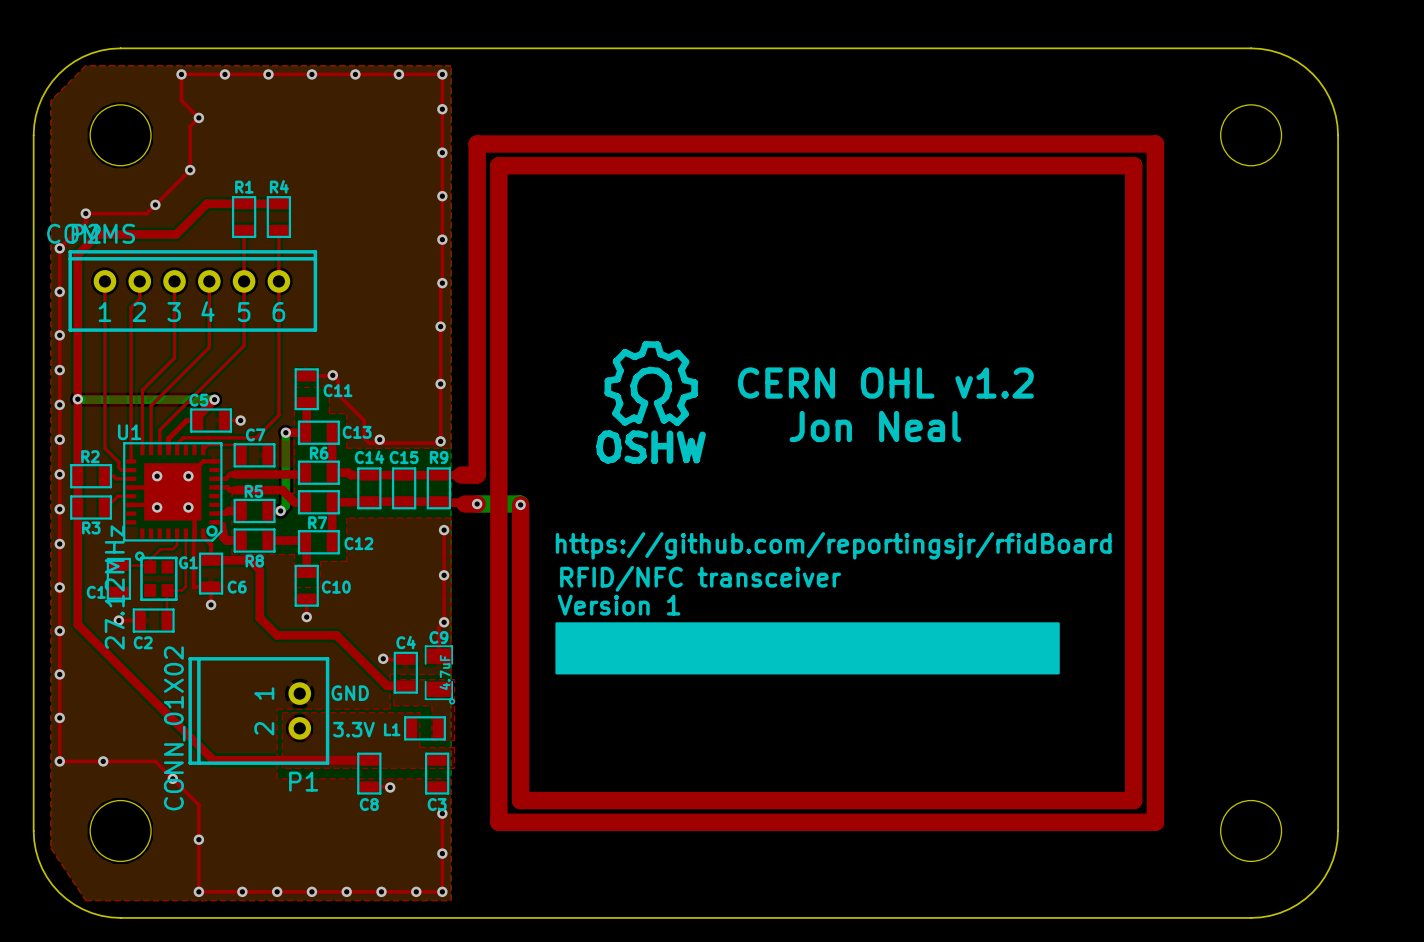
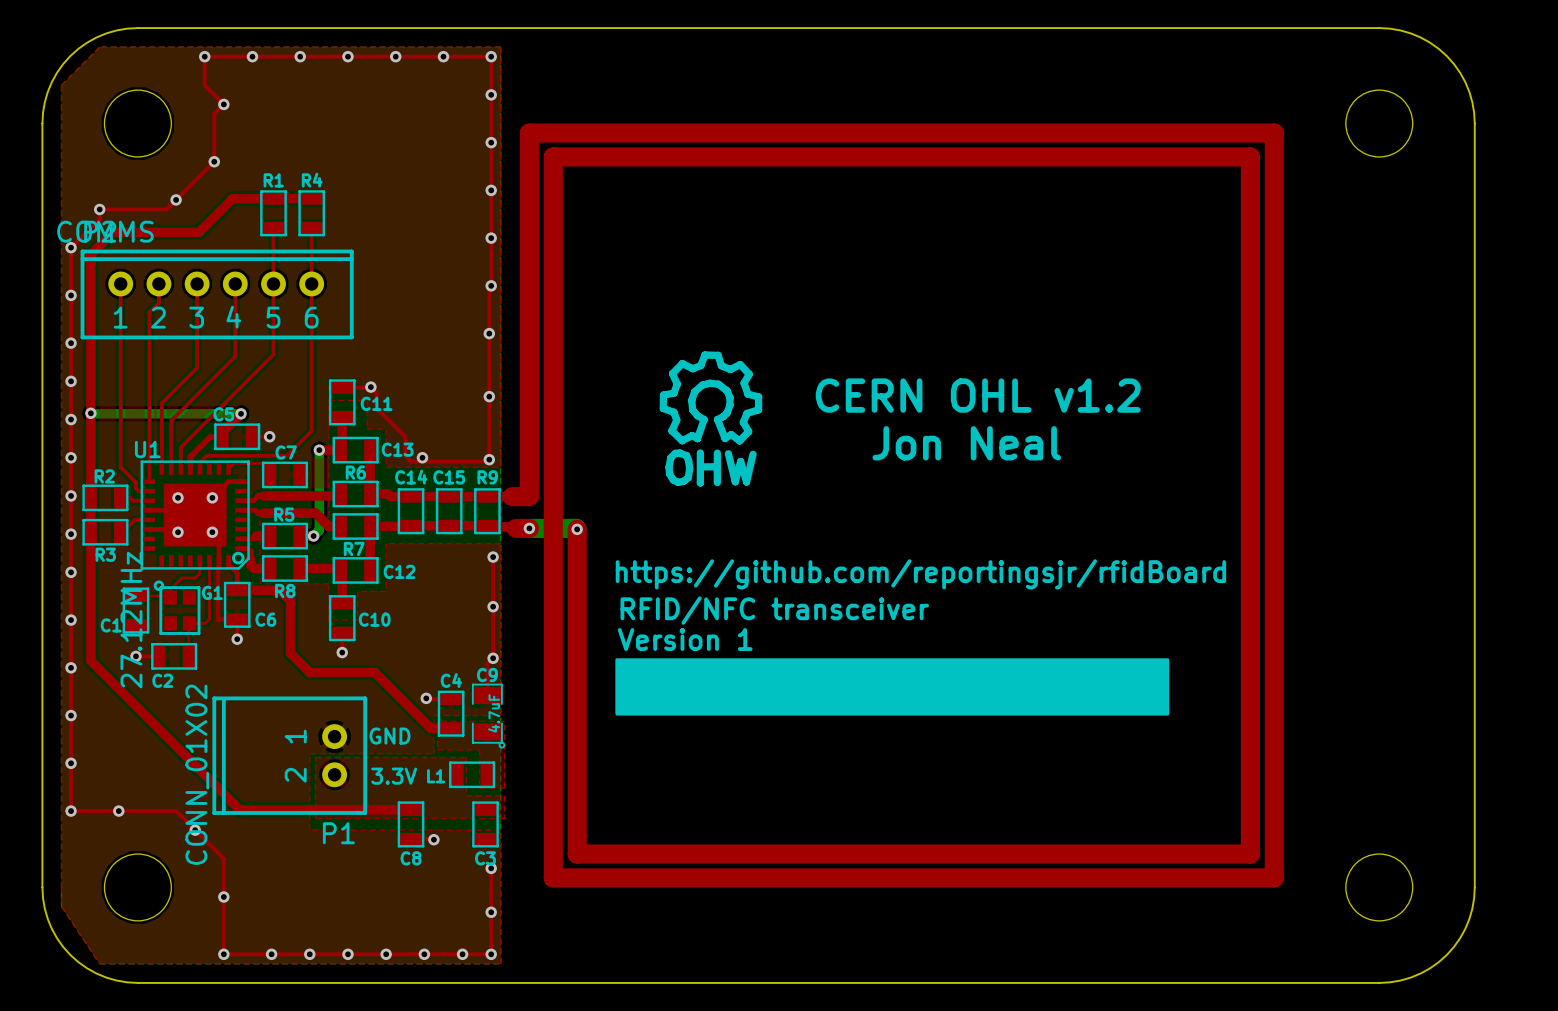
drawing shape: [596, 341, 706, 465] -> [659, 351, 763, 487]

